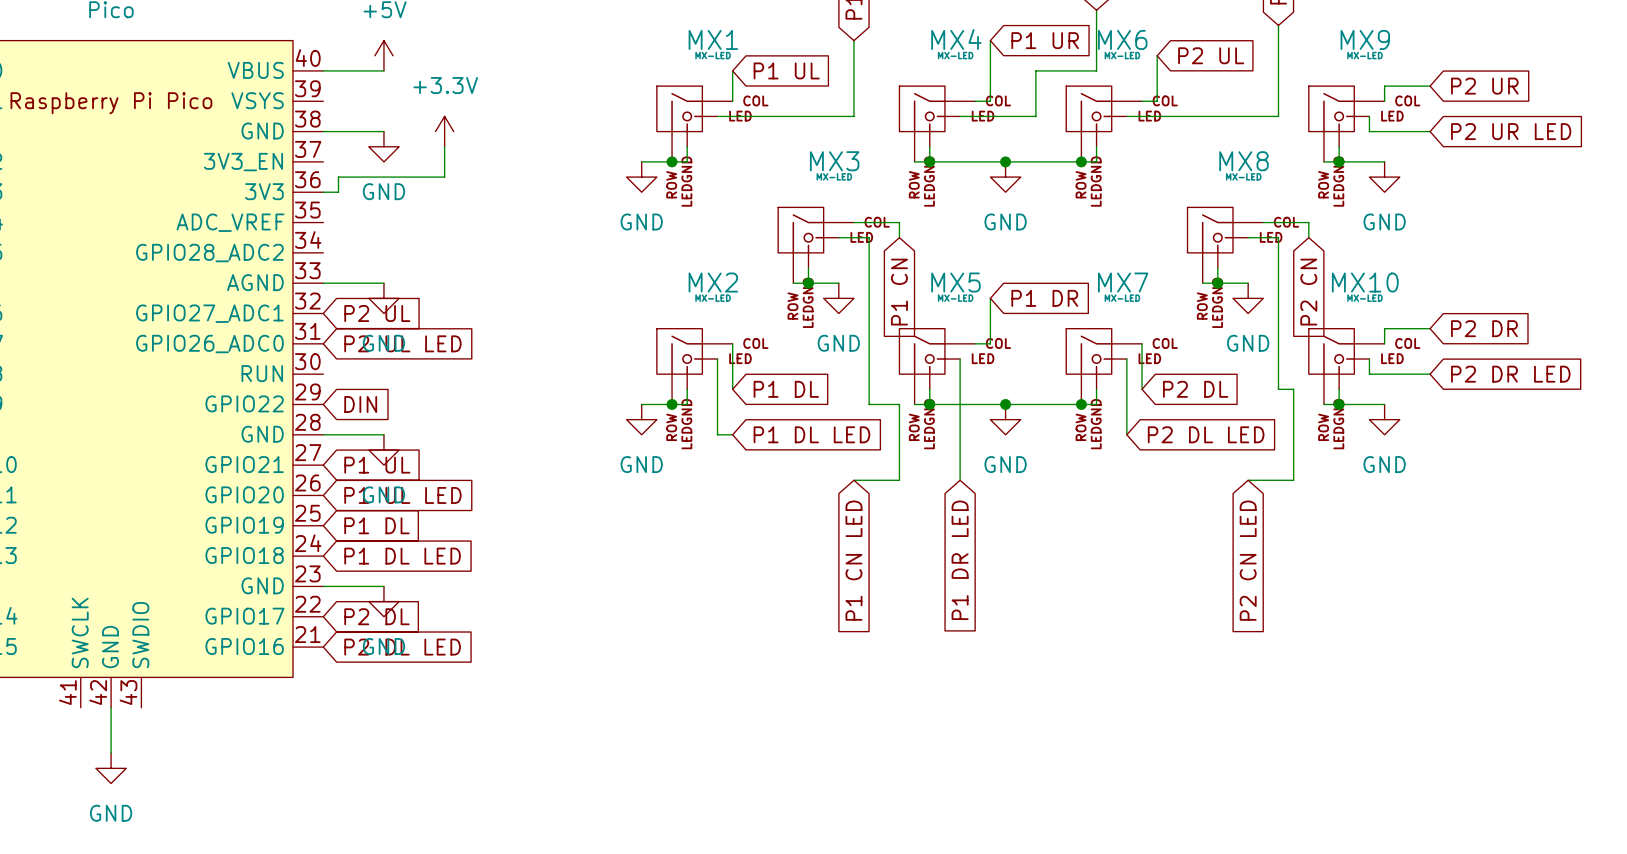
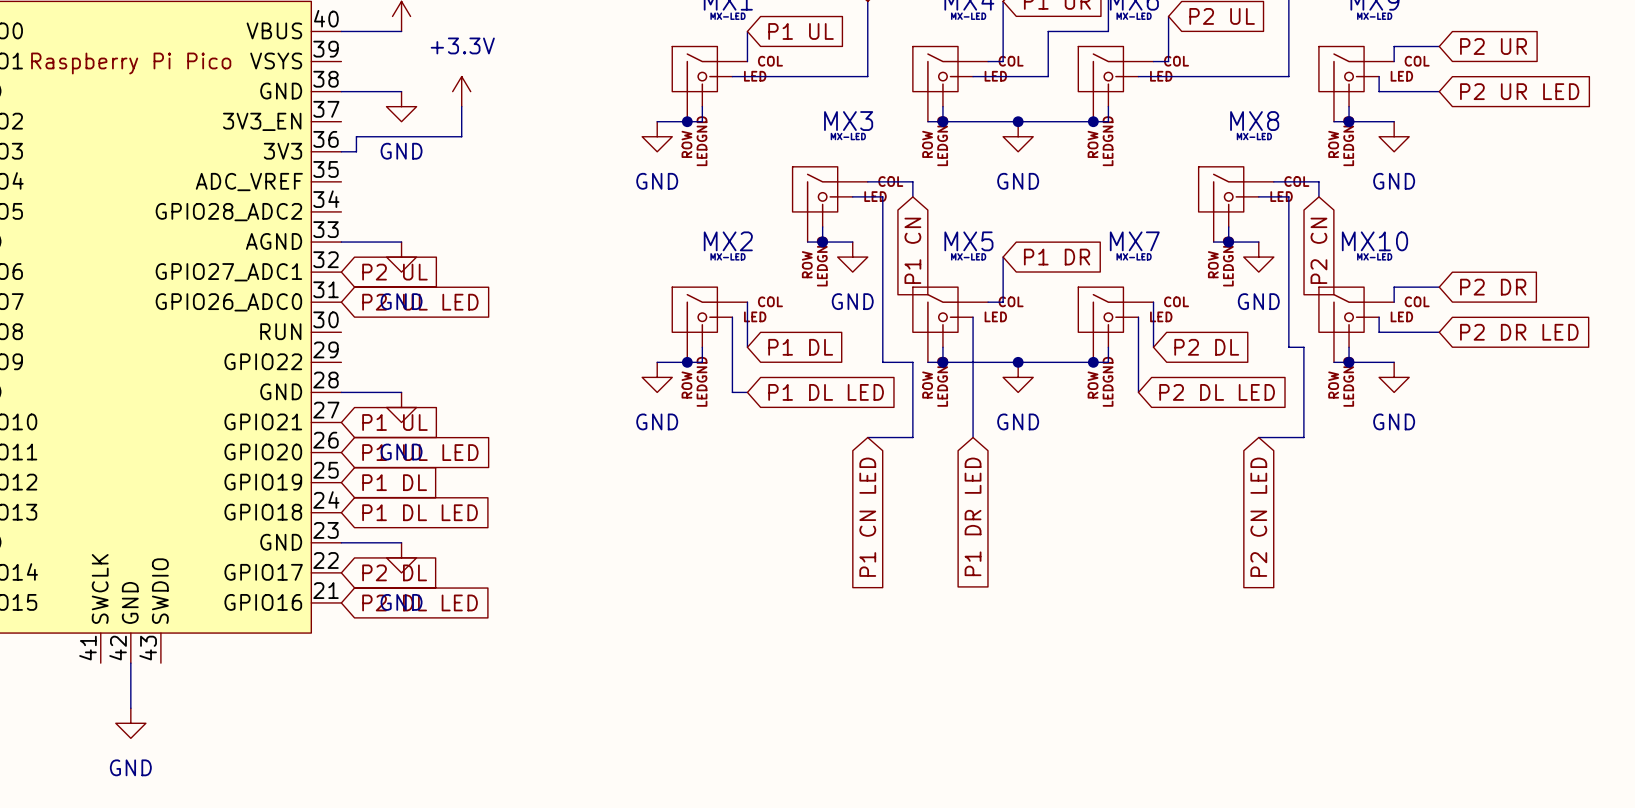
global label: DIN (360, 404) -> none

